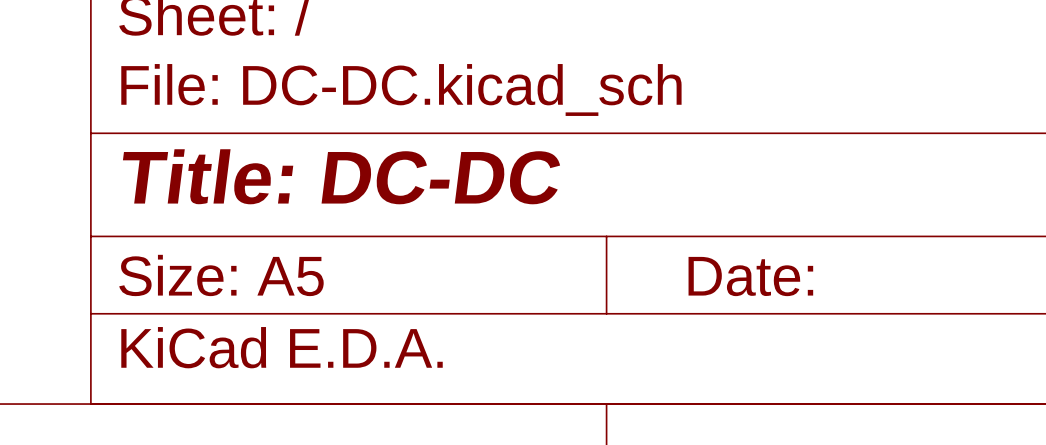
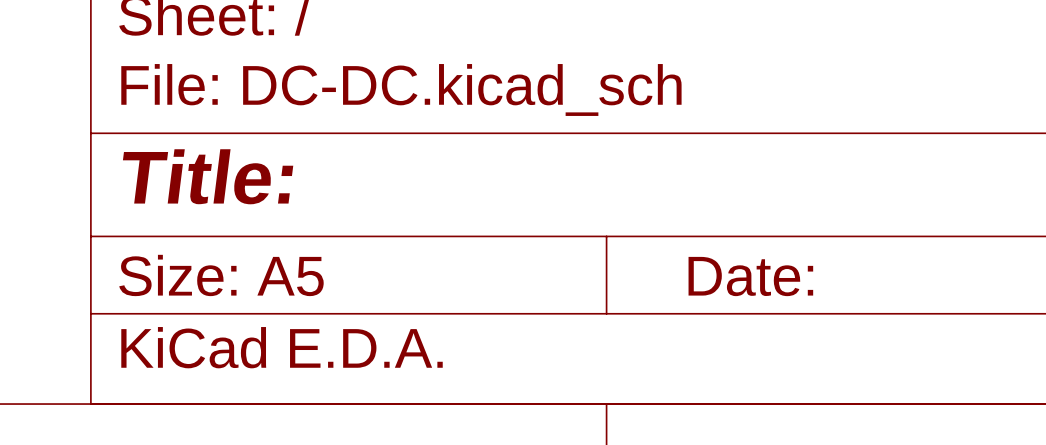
title block: Title: DC-DC (341, 176) -> Title: (208, 176)

